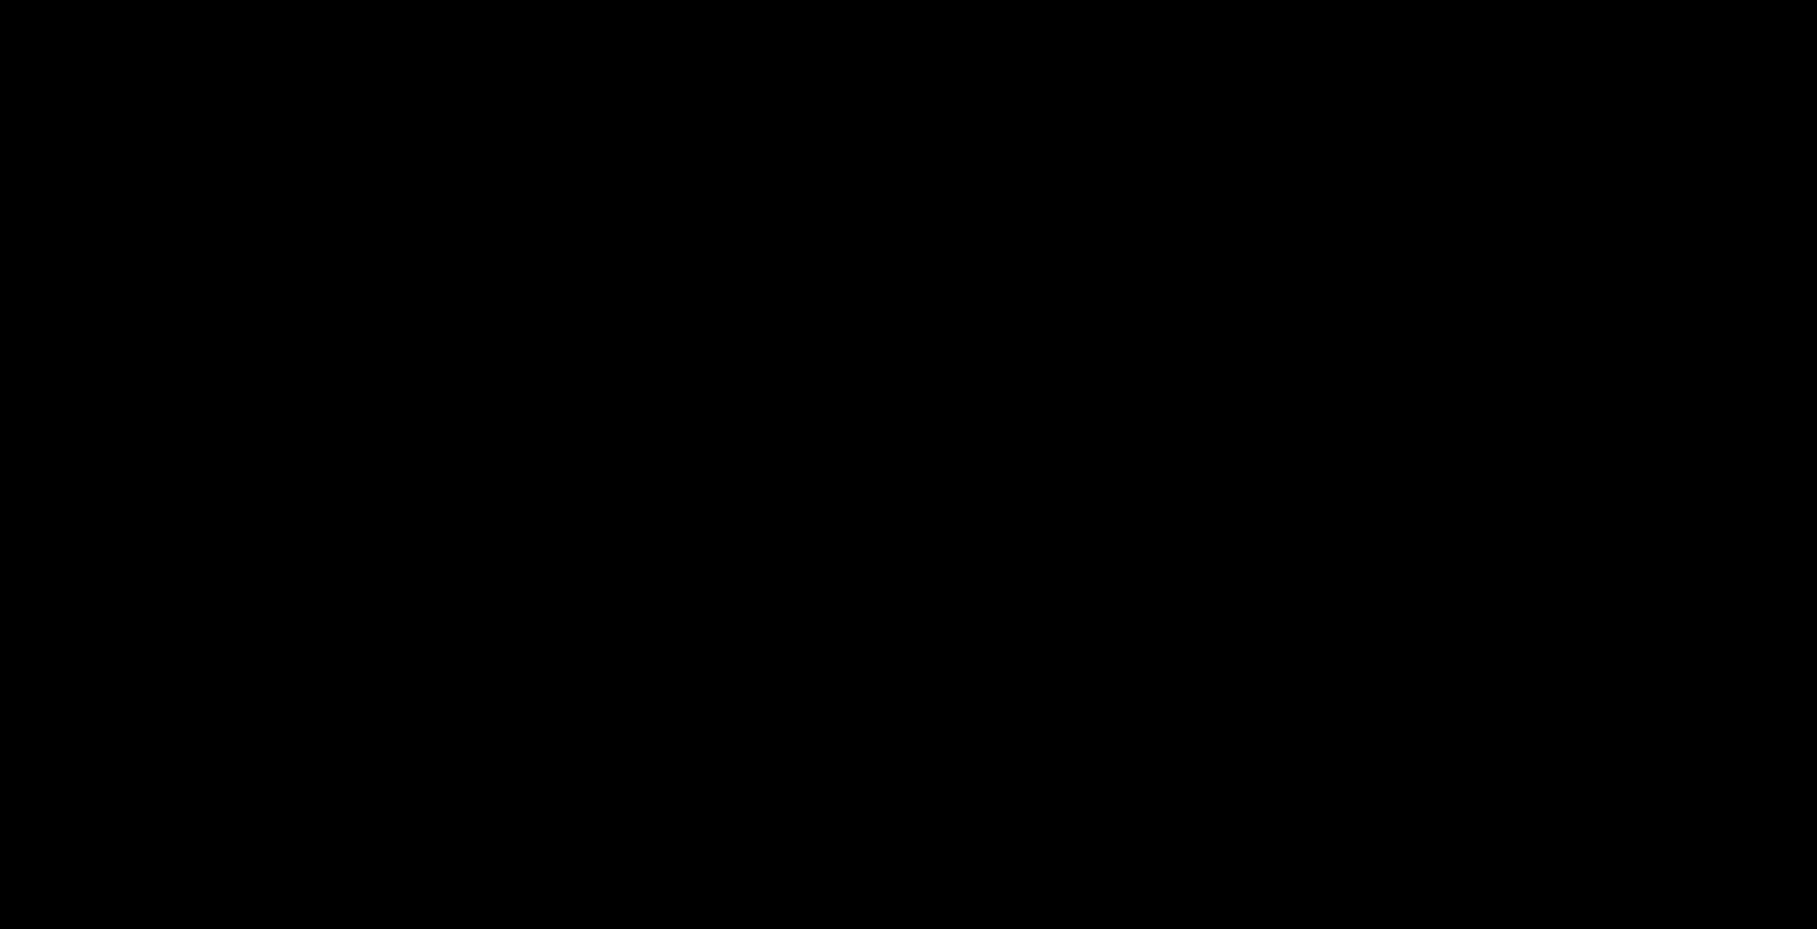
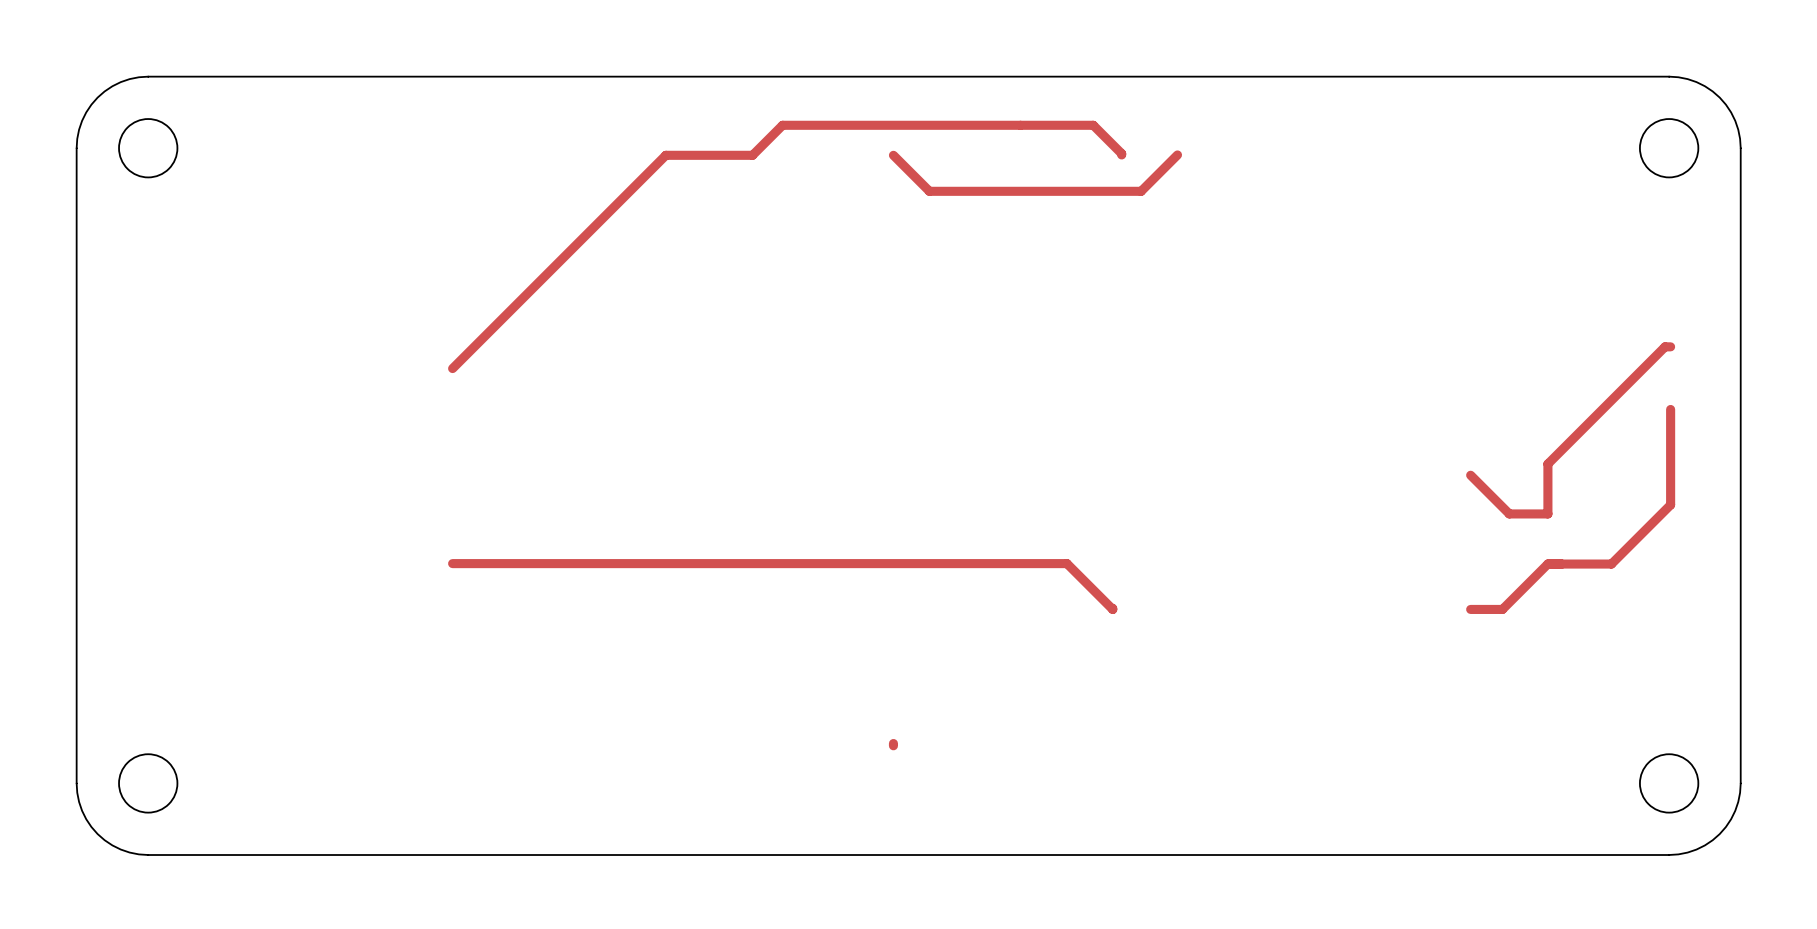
board edge: none -> (1669, 76) (148, 76) (120, 82) (104, 91) (86, 112) (79, 129) (76, 148) (76, 783) (82, 810) (91, 827) (104, 840) (129, 852) (148, 855) (1669, 855) (1696, 849) (1712, 840) (1725, 827) (1738, 801) (1740, 783) (1740, 148) (1735, 120) (1719, 97) (1696, 82) (1669, 76)
round board edge: none -> [118, 118, 179, 179]
round board edge: none -> [1639, 118, 1700, 179]
top track: none -> (1121, 154) (1093, 125) (782, 125) (752, 155) (665, 155) (452, 368)
top track: none -> (1177, 154) (1141, 191) (929, 191) (893, 155)
top track: none -> (1670, 346) (1665, 346) (1547, 464) (1547, 513) (1509, 513) (1470, 475)
top track: none -> (1670, 409) (1670, 504) (1611, 564) (1547, 564) (1502, 609) (1470, 609)
top track: none -> (452, 563) (1066, 563) (1112, 608)
top track: none -> (893, 743) (893, 745)
round board edge: none -> [118, 753, 179, 814]
round board edge: none -> [1639, 753, 1700, 814]

